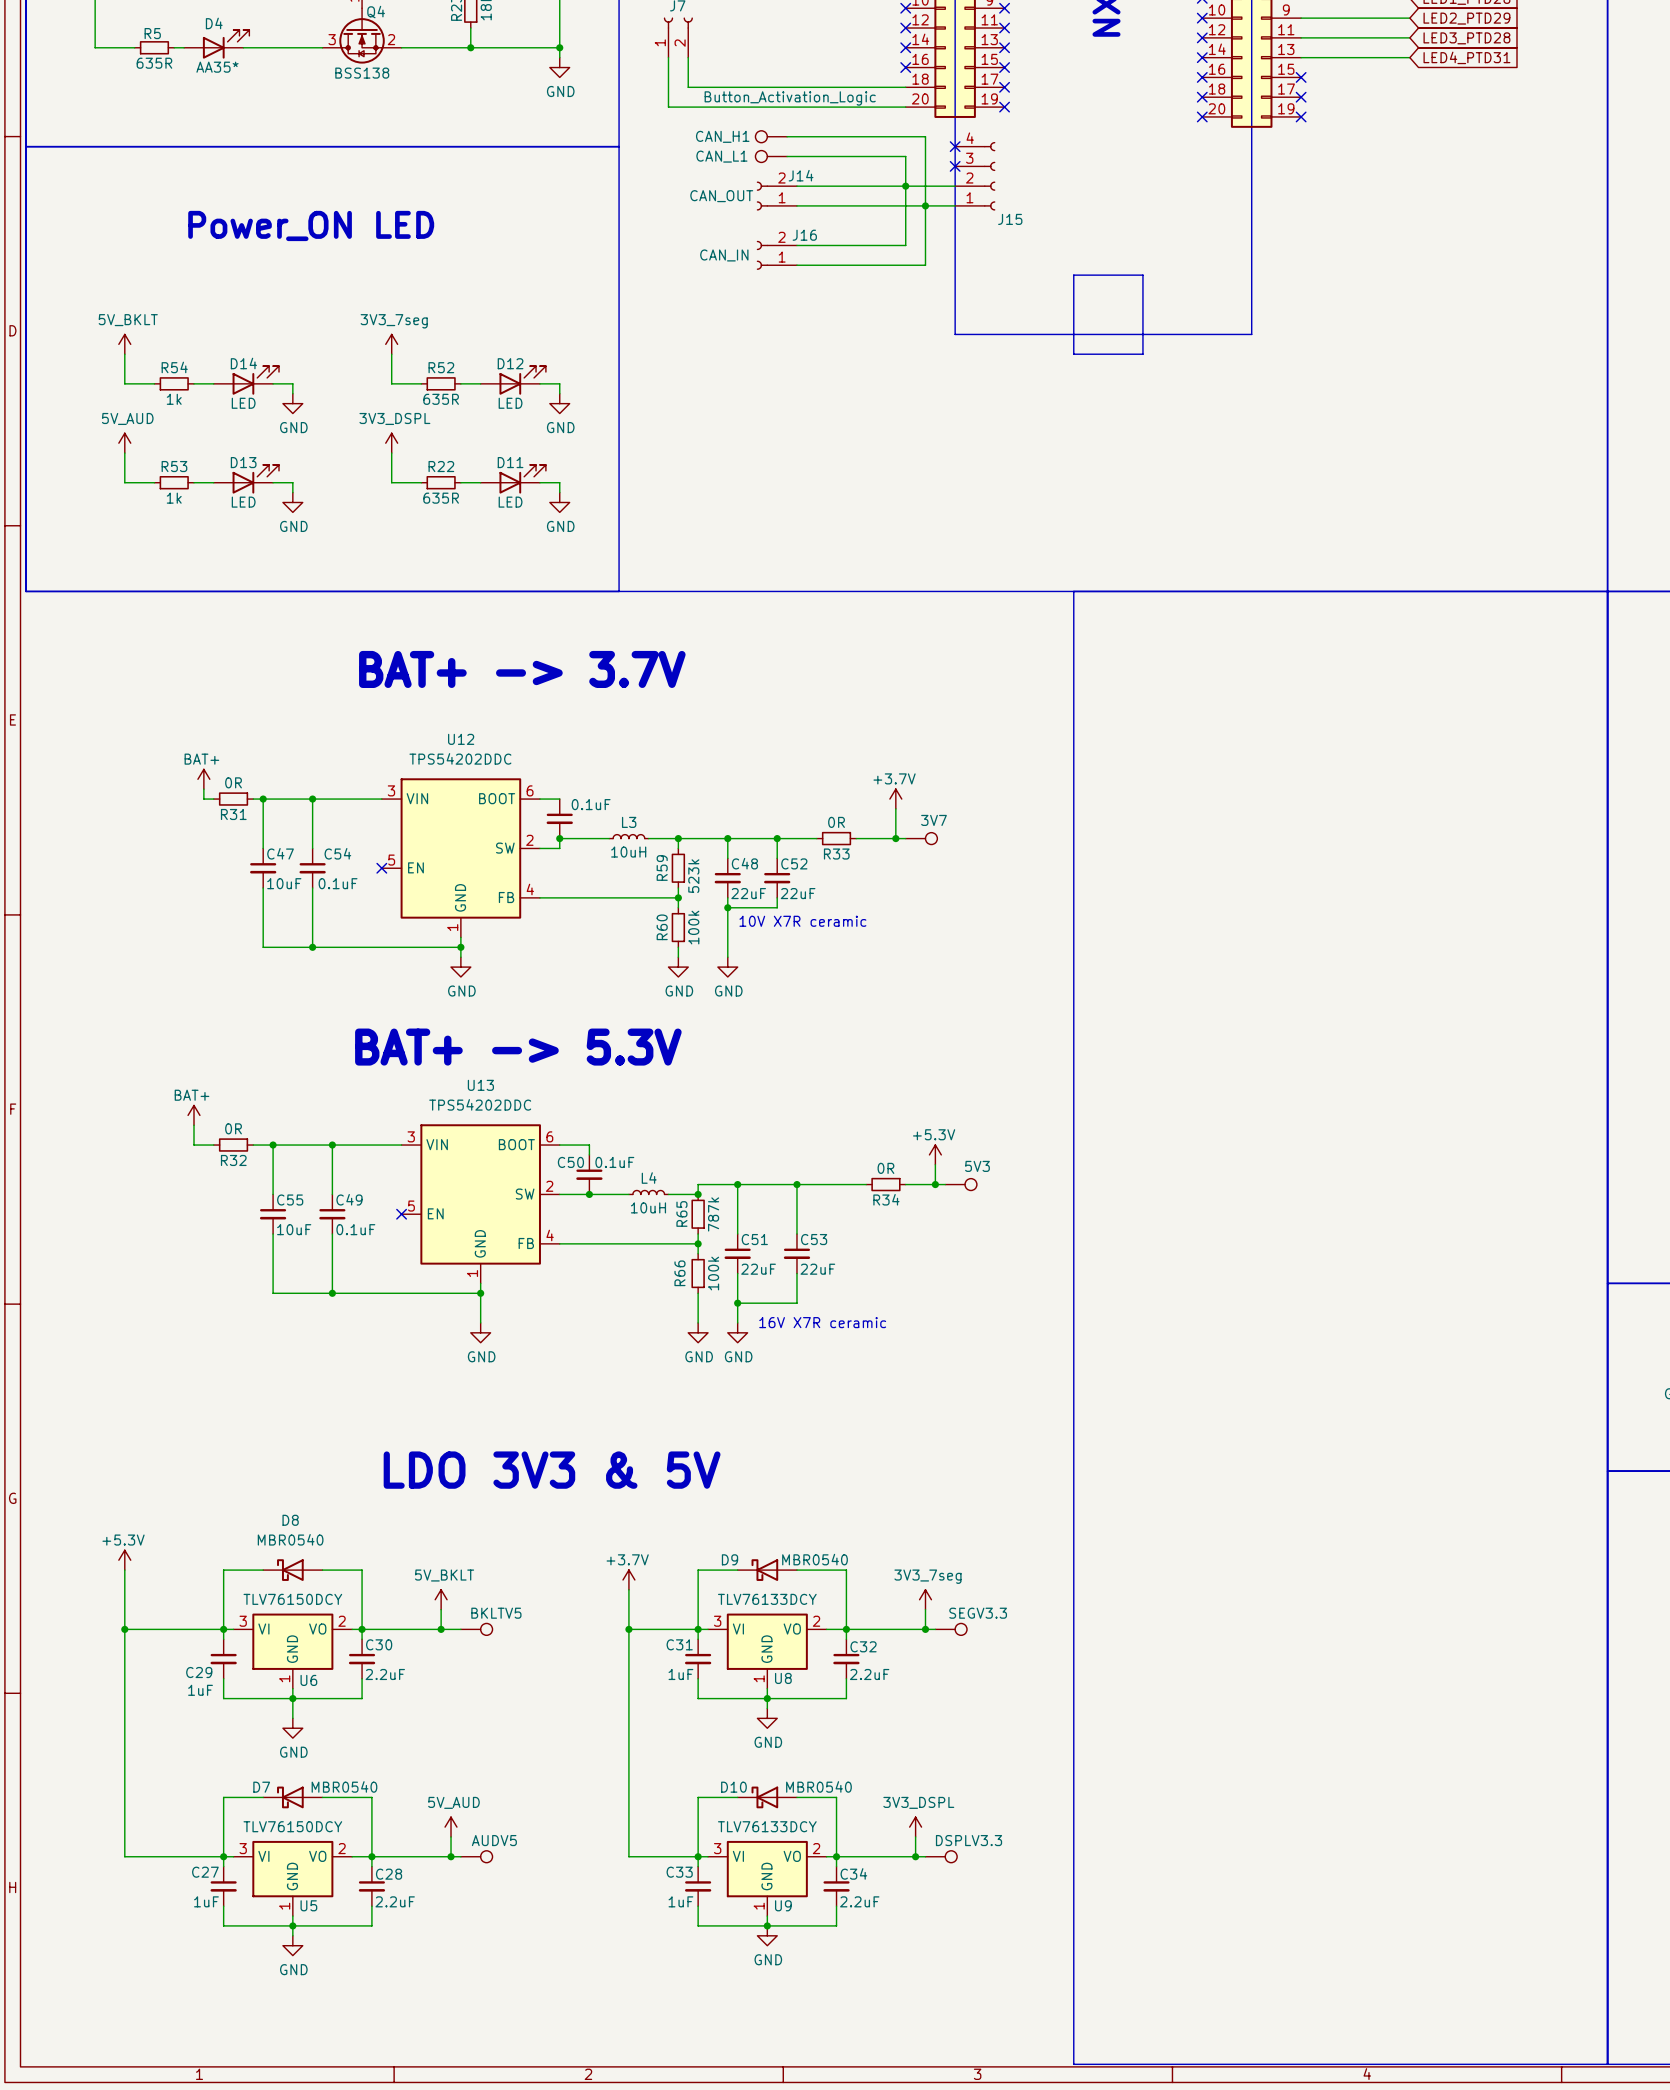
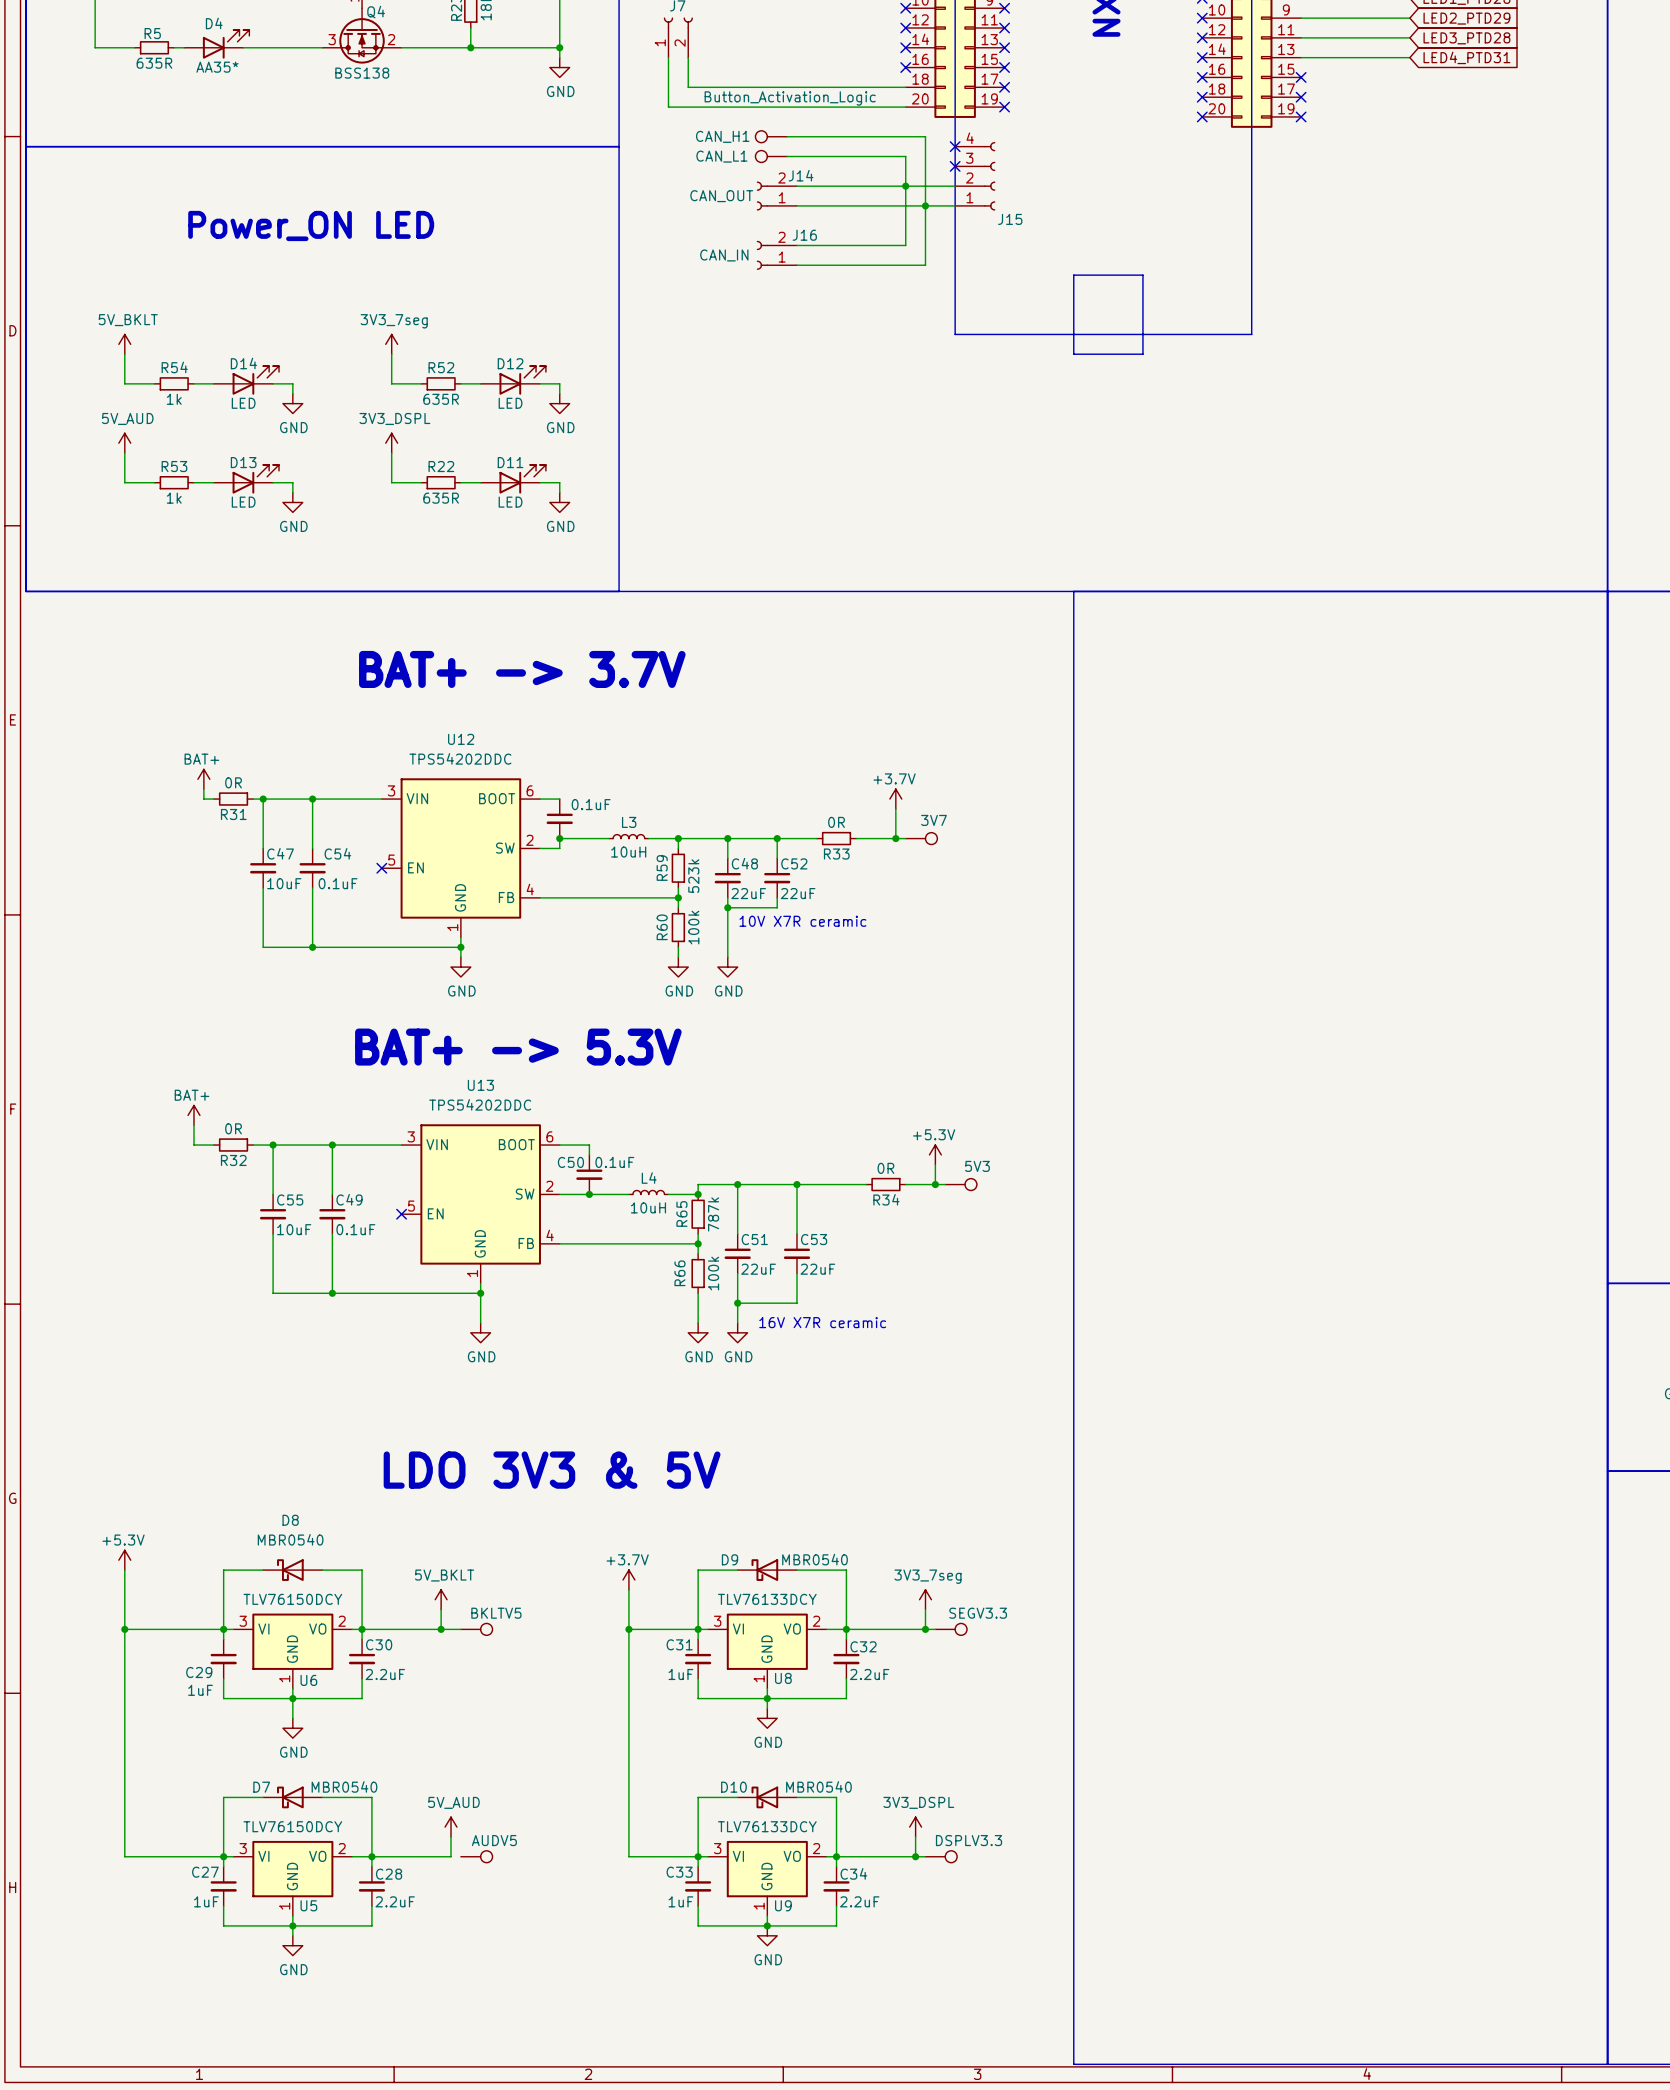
wire: (451, 1856) (460, 1856) -> none
junction: (451, 1856) -> none

